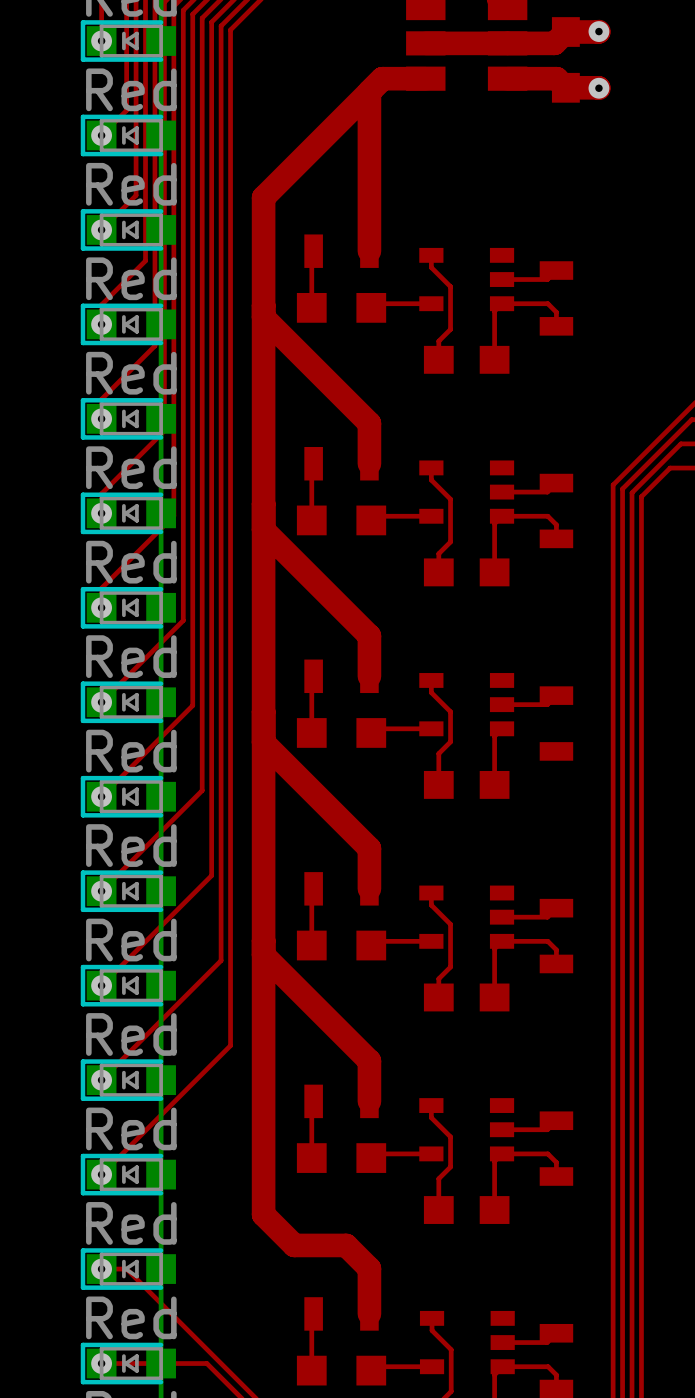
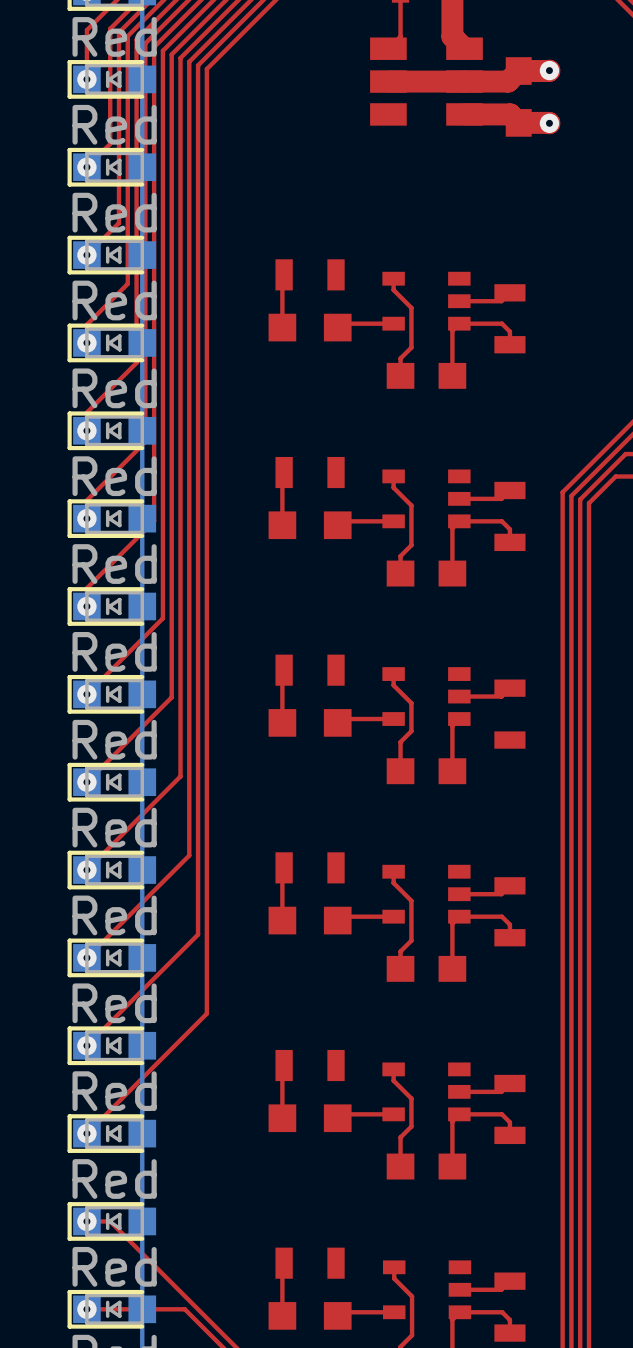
top track: (425, 78) (382, 78) (263, 197) (263, 1214) (294, 1245) (346, 1245) (369, 1268) (369, 1313) -> none
top track: (369, 91) (369, 251) -> none
top track: (263, 317) (369, 423) (369, 463) -> none
top track: (263, 530) (369, 635) (369, 676) -> none
top track: (263, 742) (369, 848) (369, 888) -> none
top track: (263, 955) (369, 1061) (369, 1101) -> none

